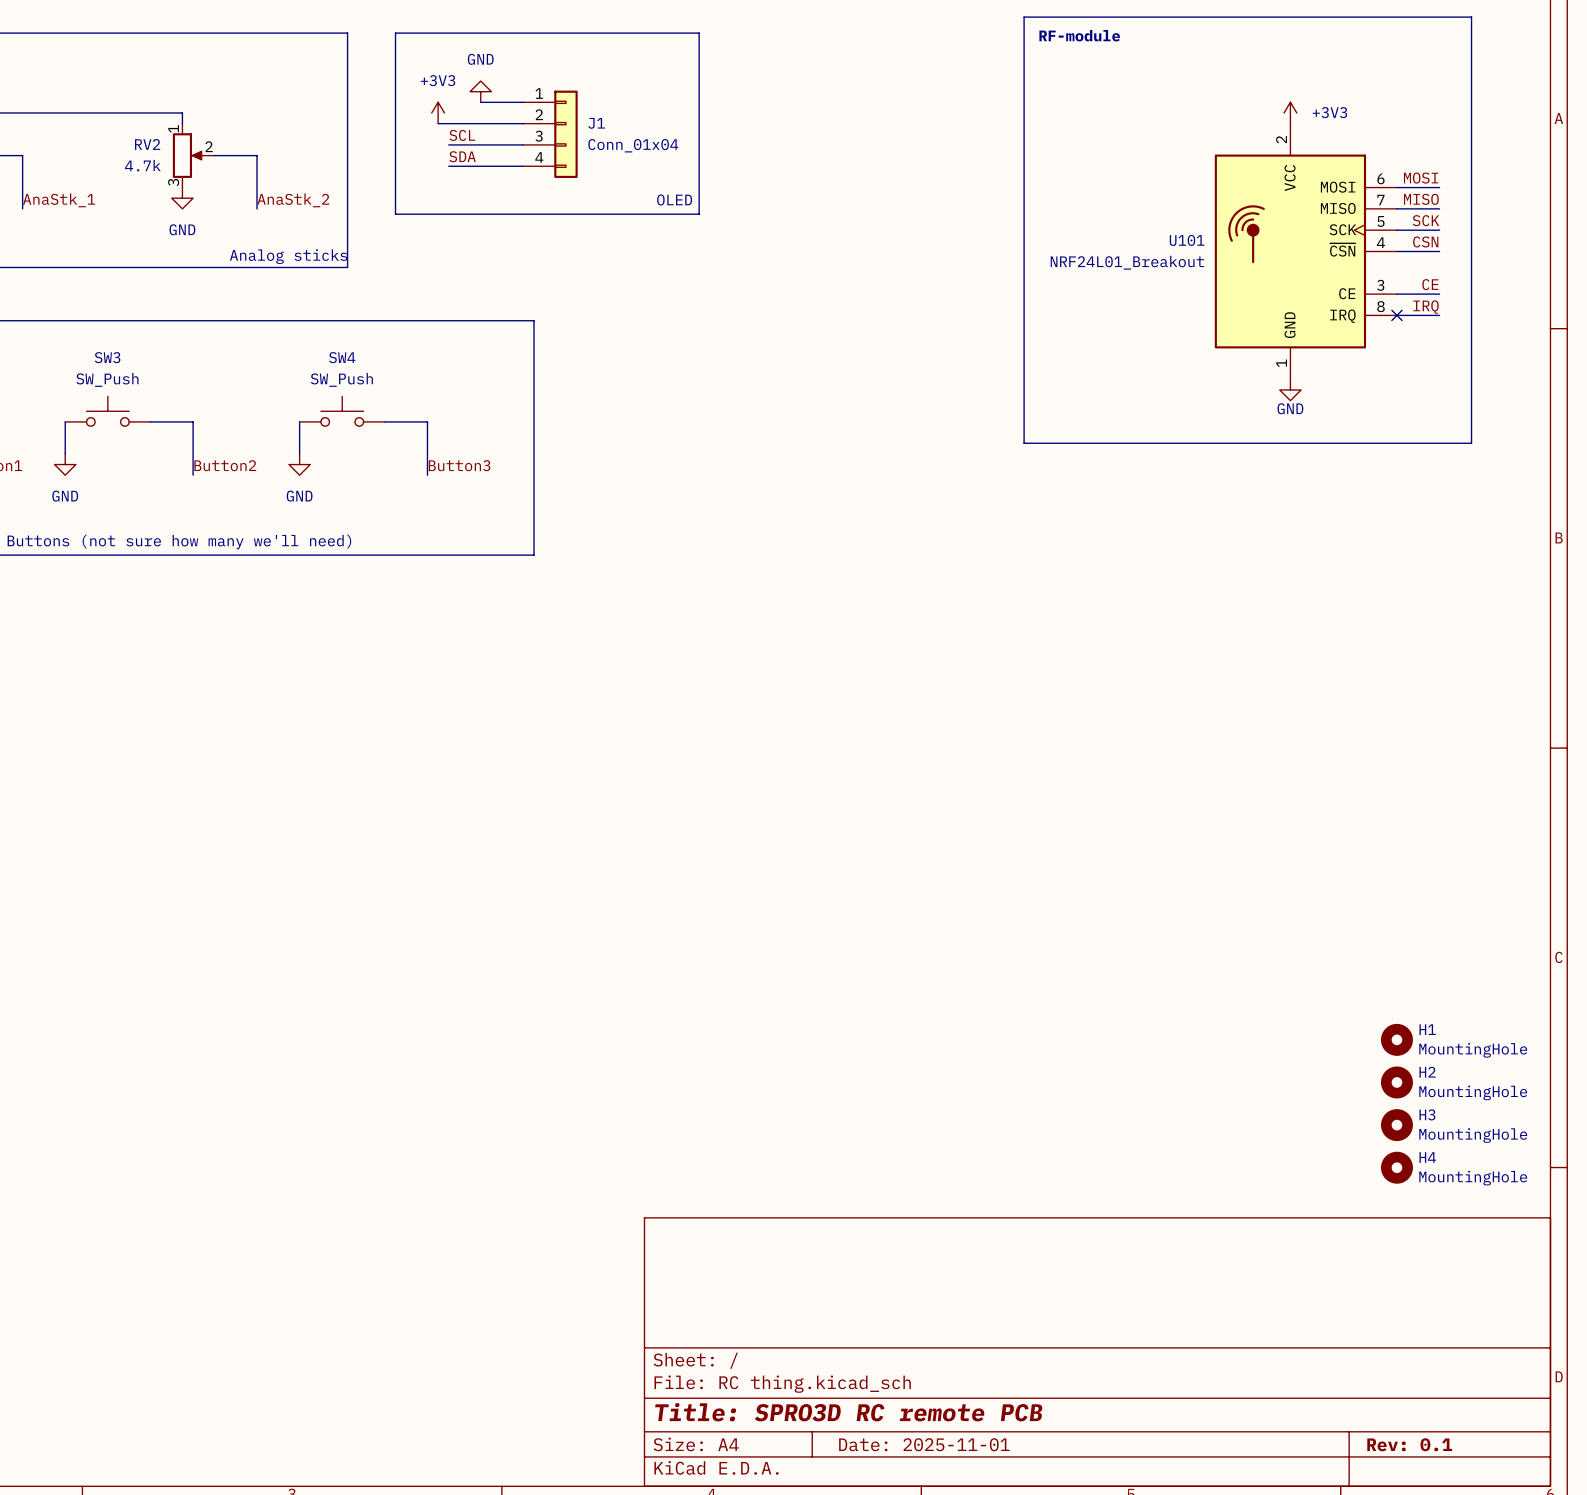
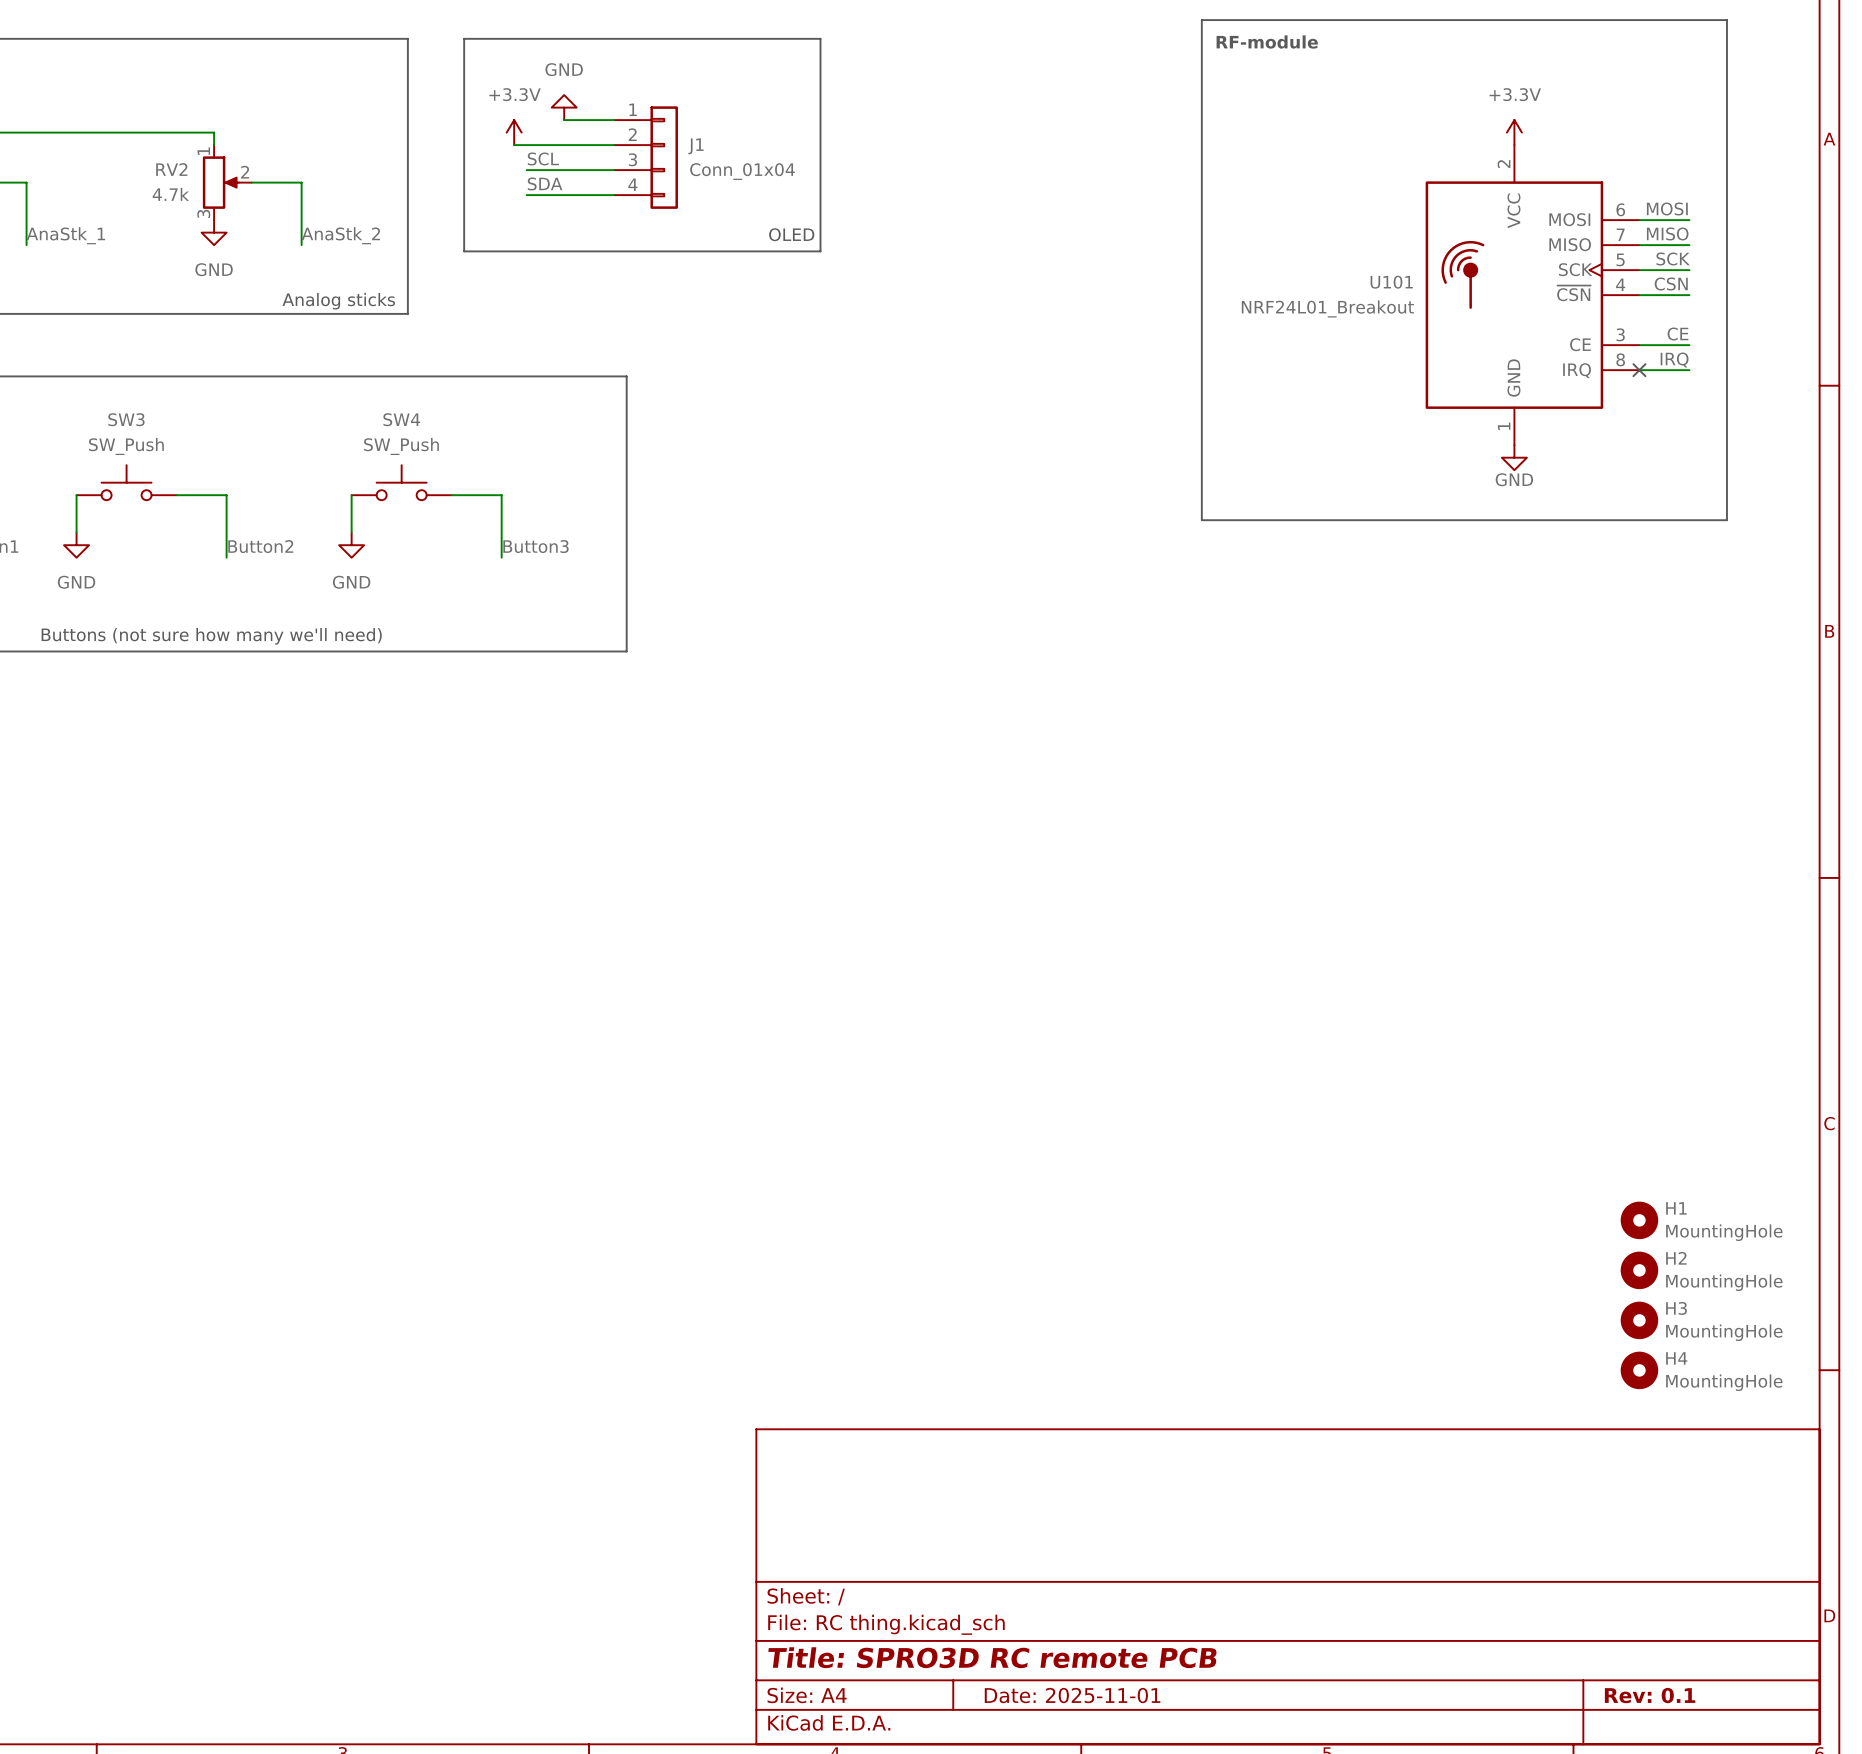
power symbol: +3V3 (438, 112) -> +3.3V (514, 132)
power symbol: +3V3 (1290, 112) -> +3.3V (1514, 132)

